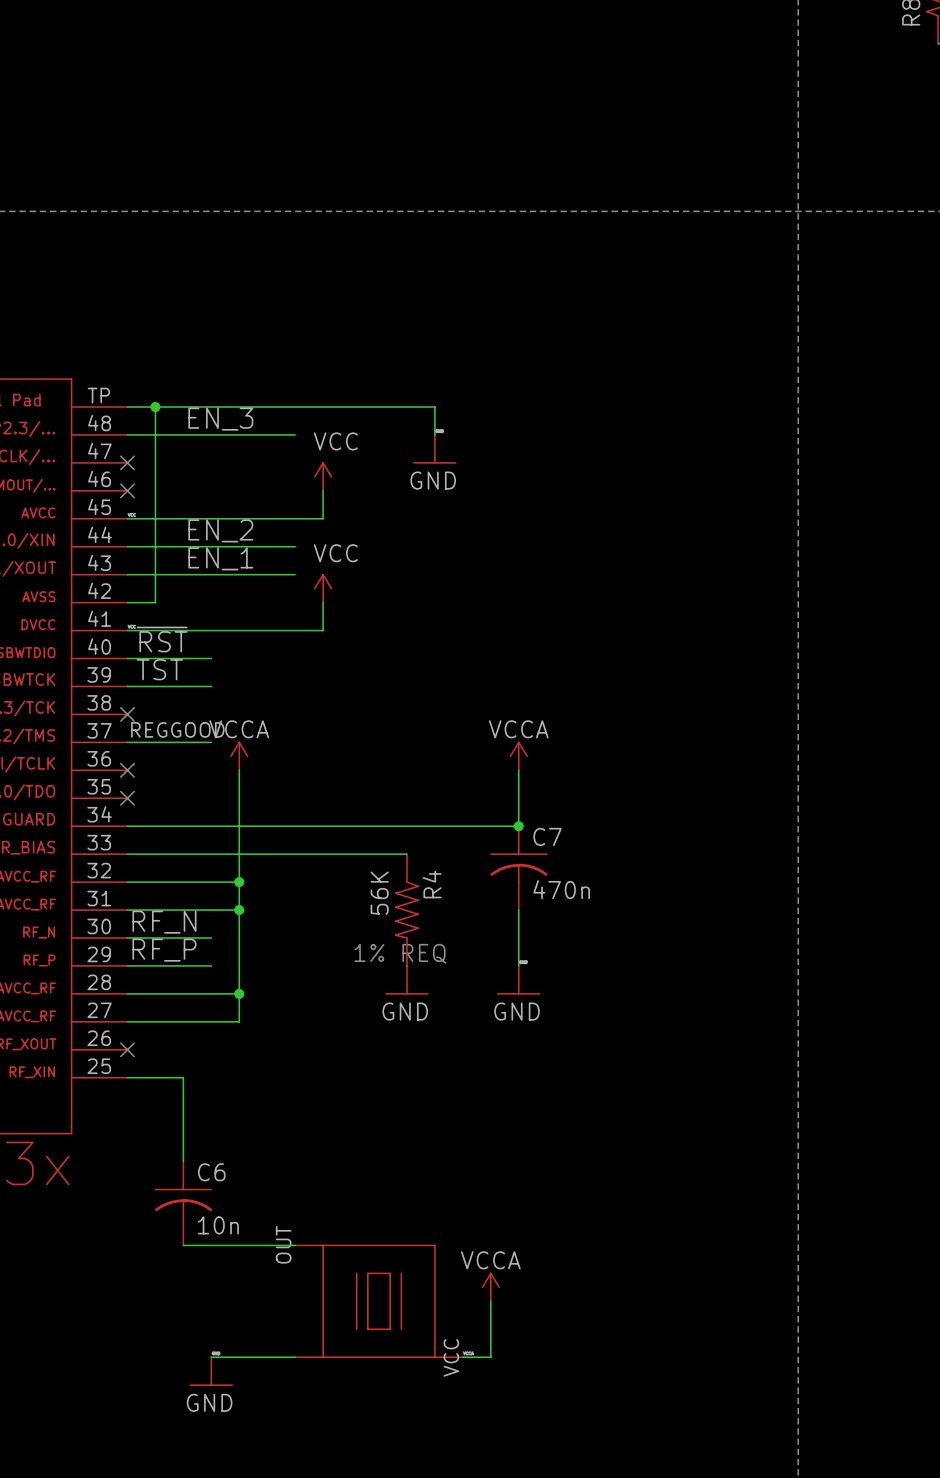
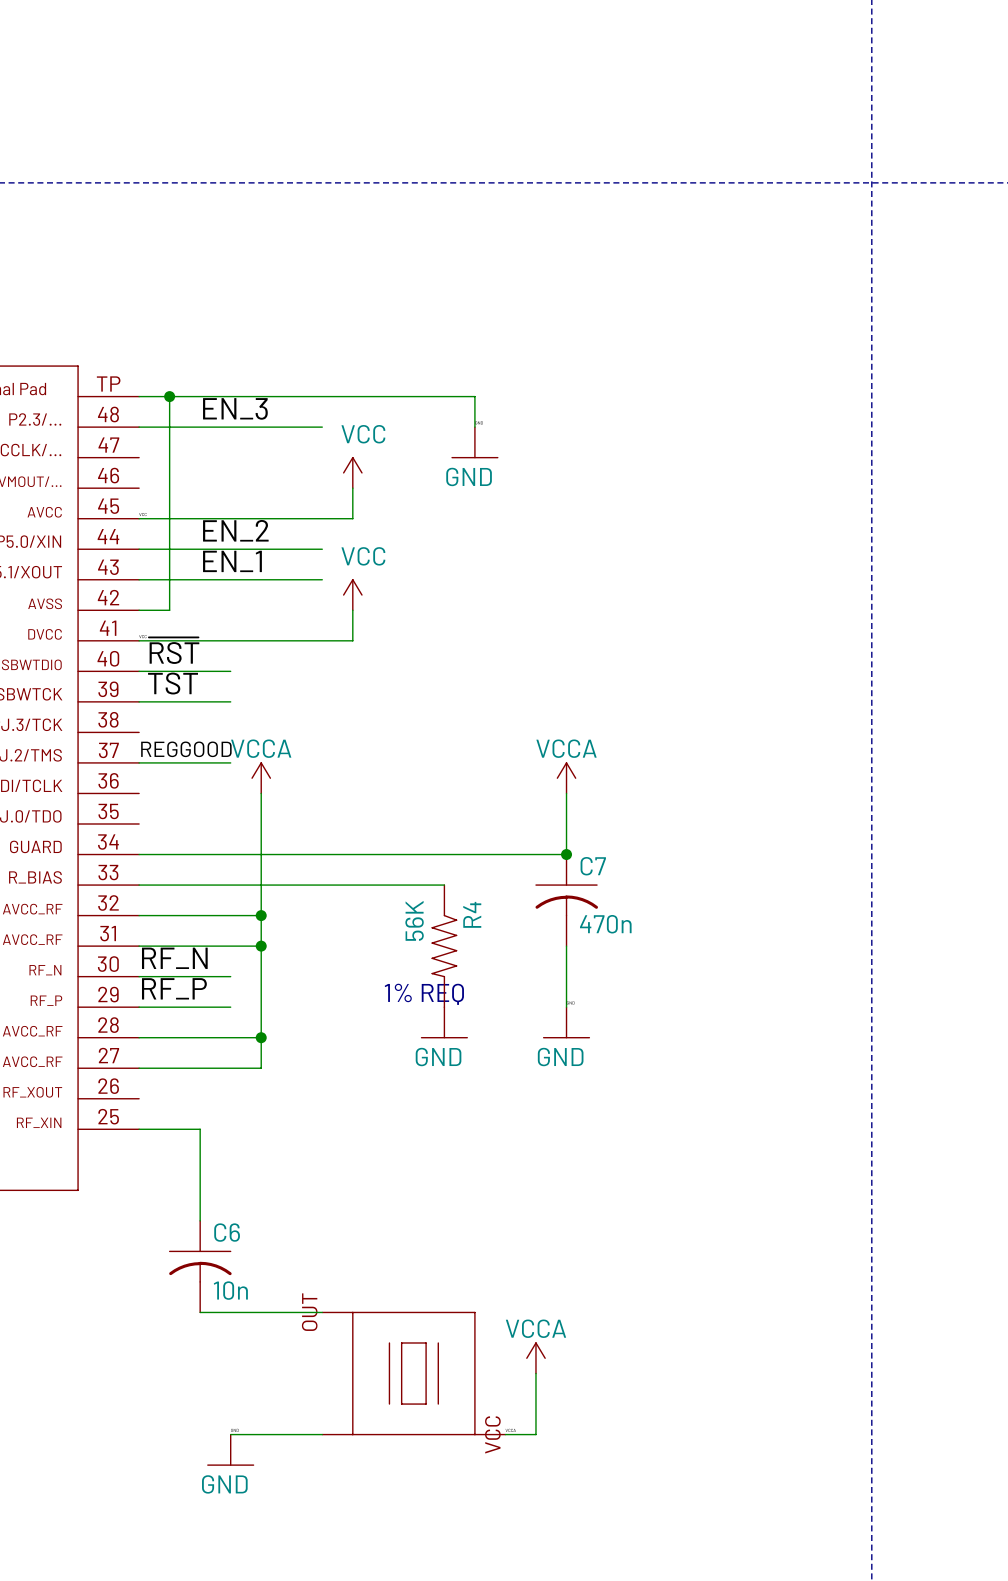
no-connect mark: (127, 462) -> none
no-connect mark: (127, 490) -> none
no-connect mark: (127, 714) -> none
no-connect mark: (127, 770) -> none
no-connect mark: (127, 798) -> none
no-connect mark: (127, 1049) -> none

